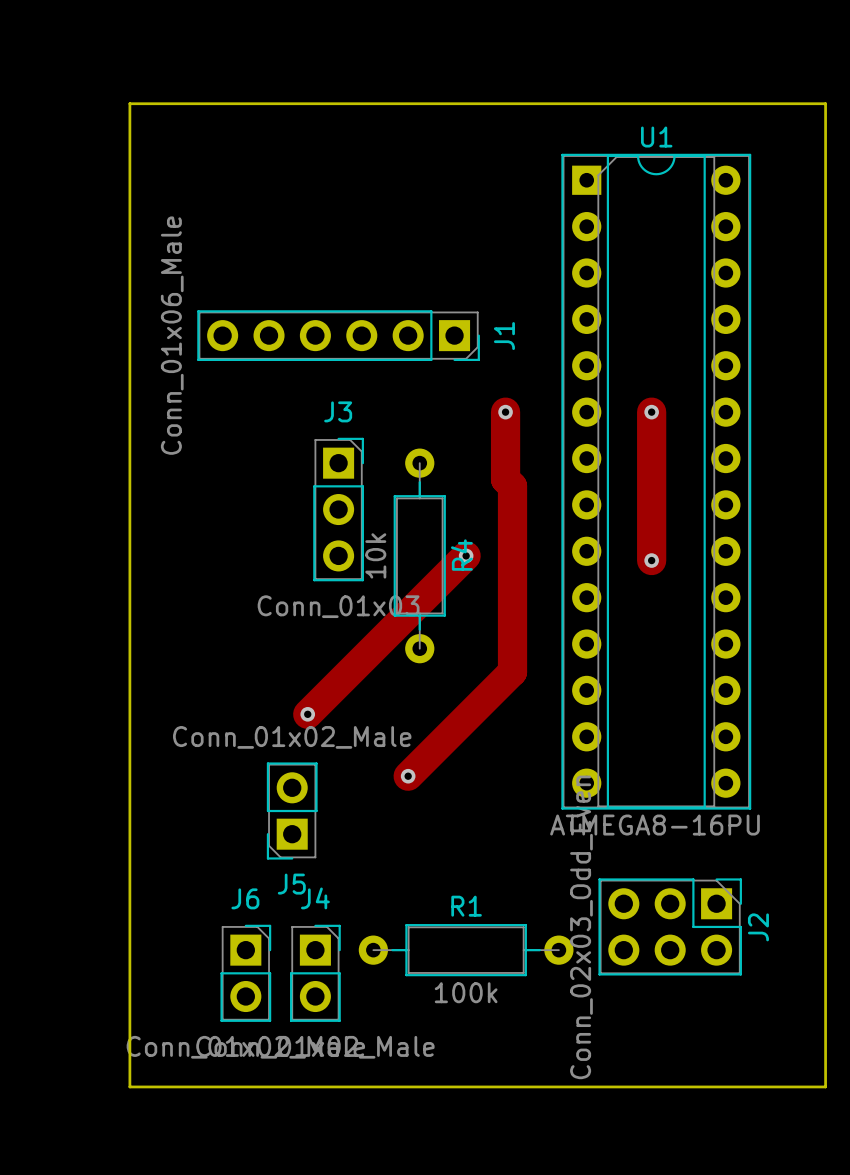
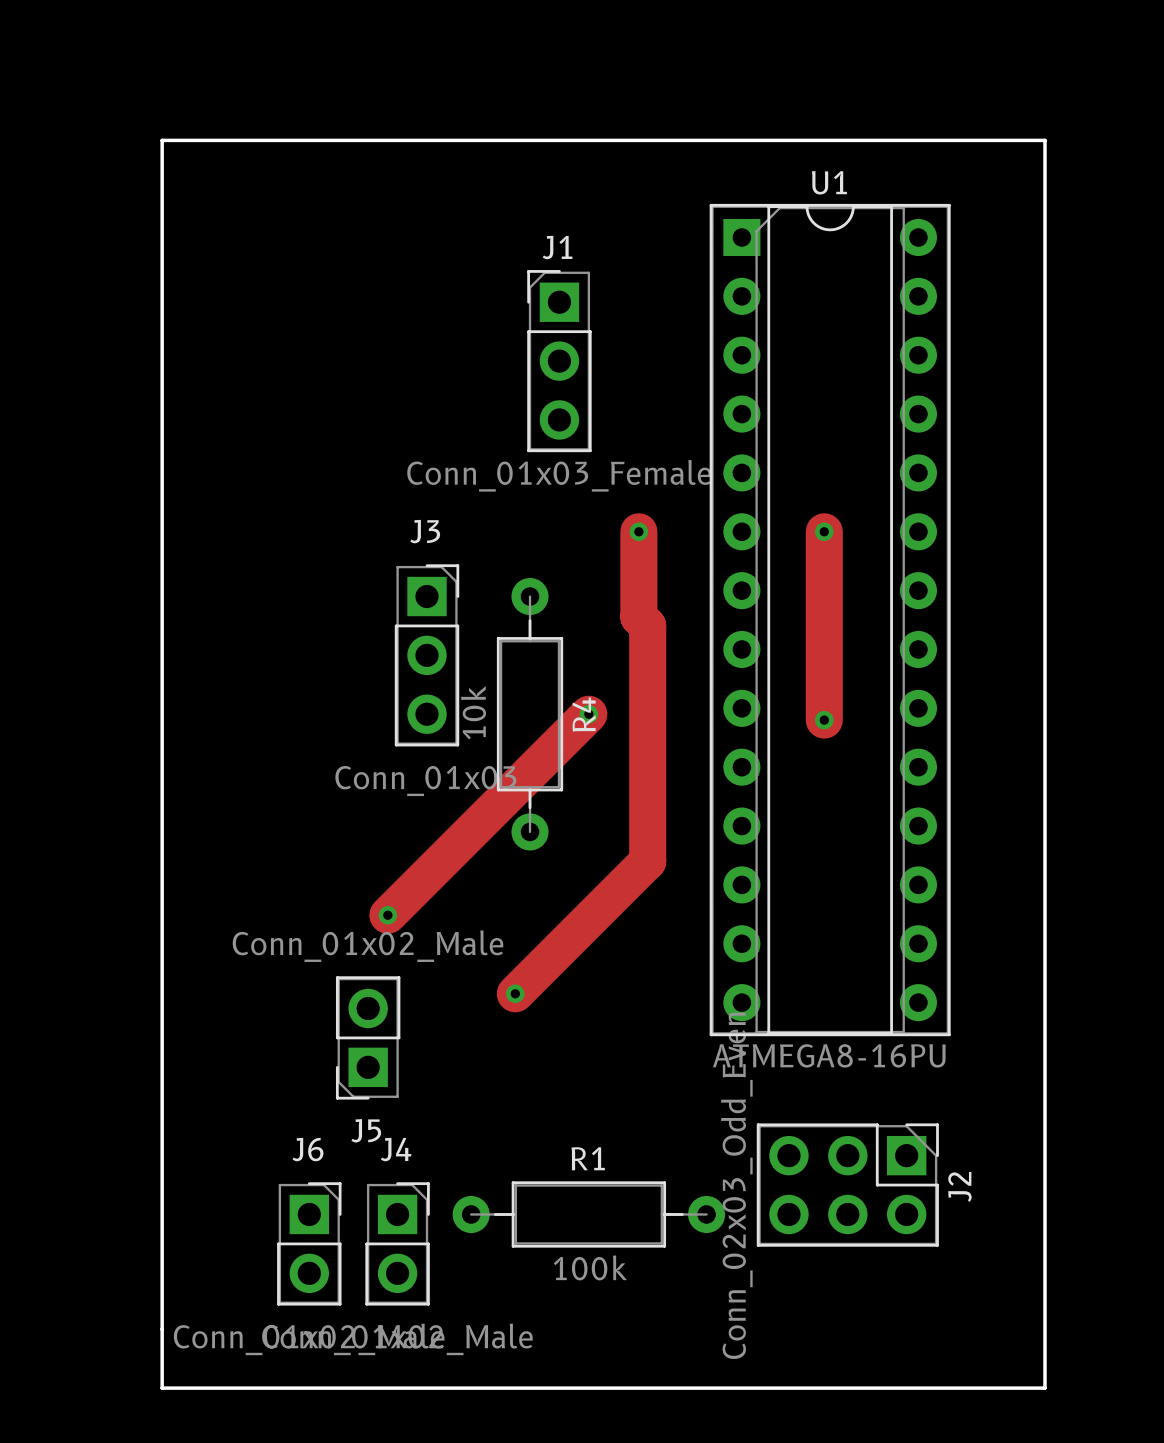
J1 footprint: [197, 310, 480, 362] -> [527, 270, 592, 453]
J1 value: Conn_01x06_Male (172, 335) -> Conn_01x03_Female (559, 475)
J1 name position: J1 (504, 336) -> J1 (557, 247)

